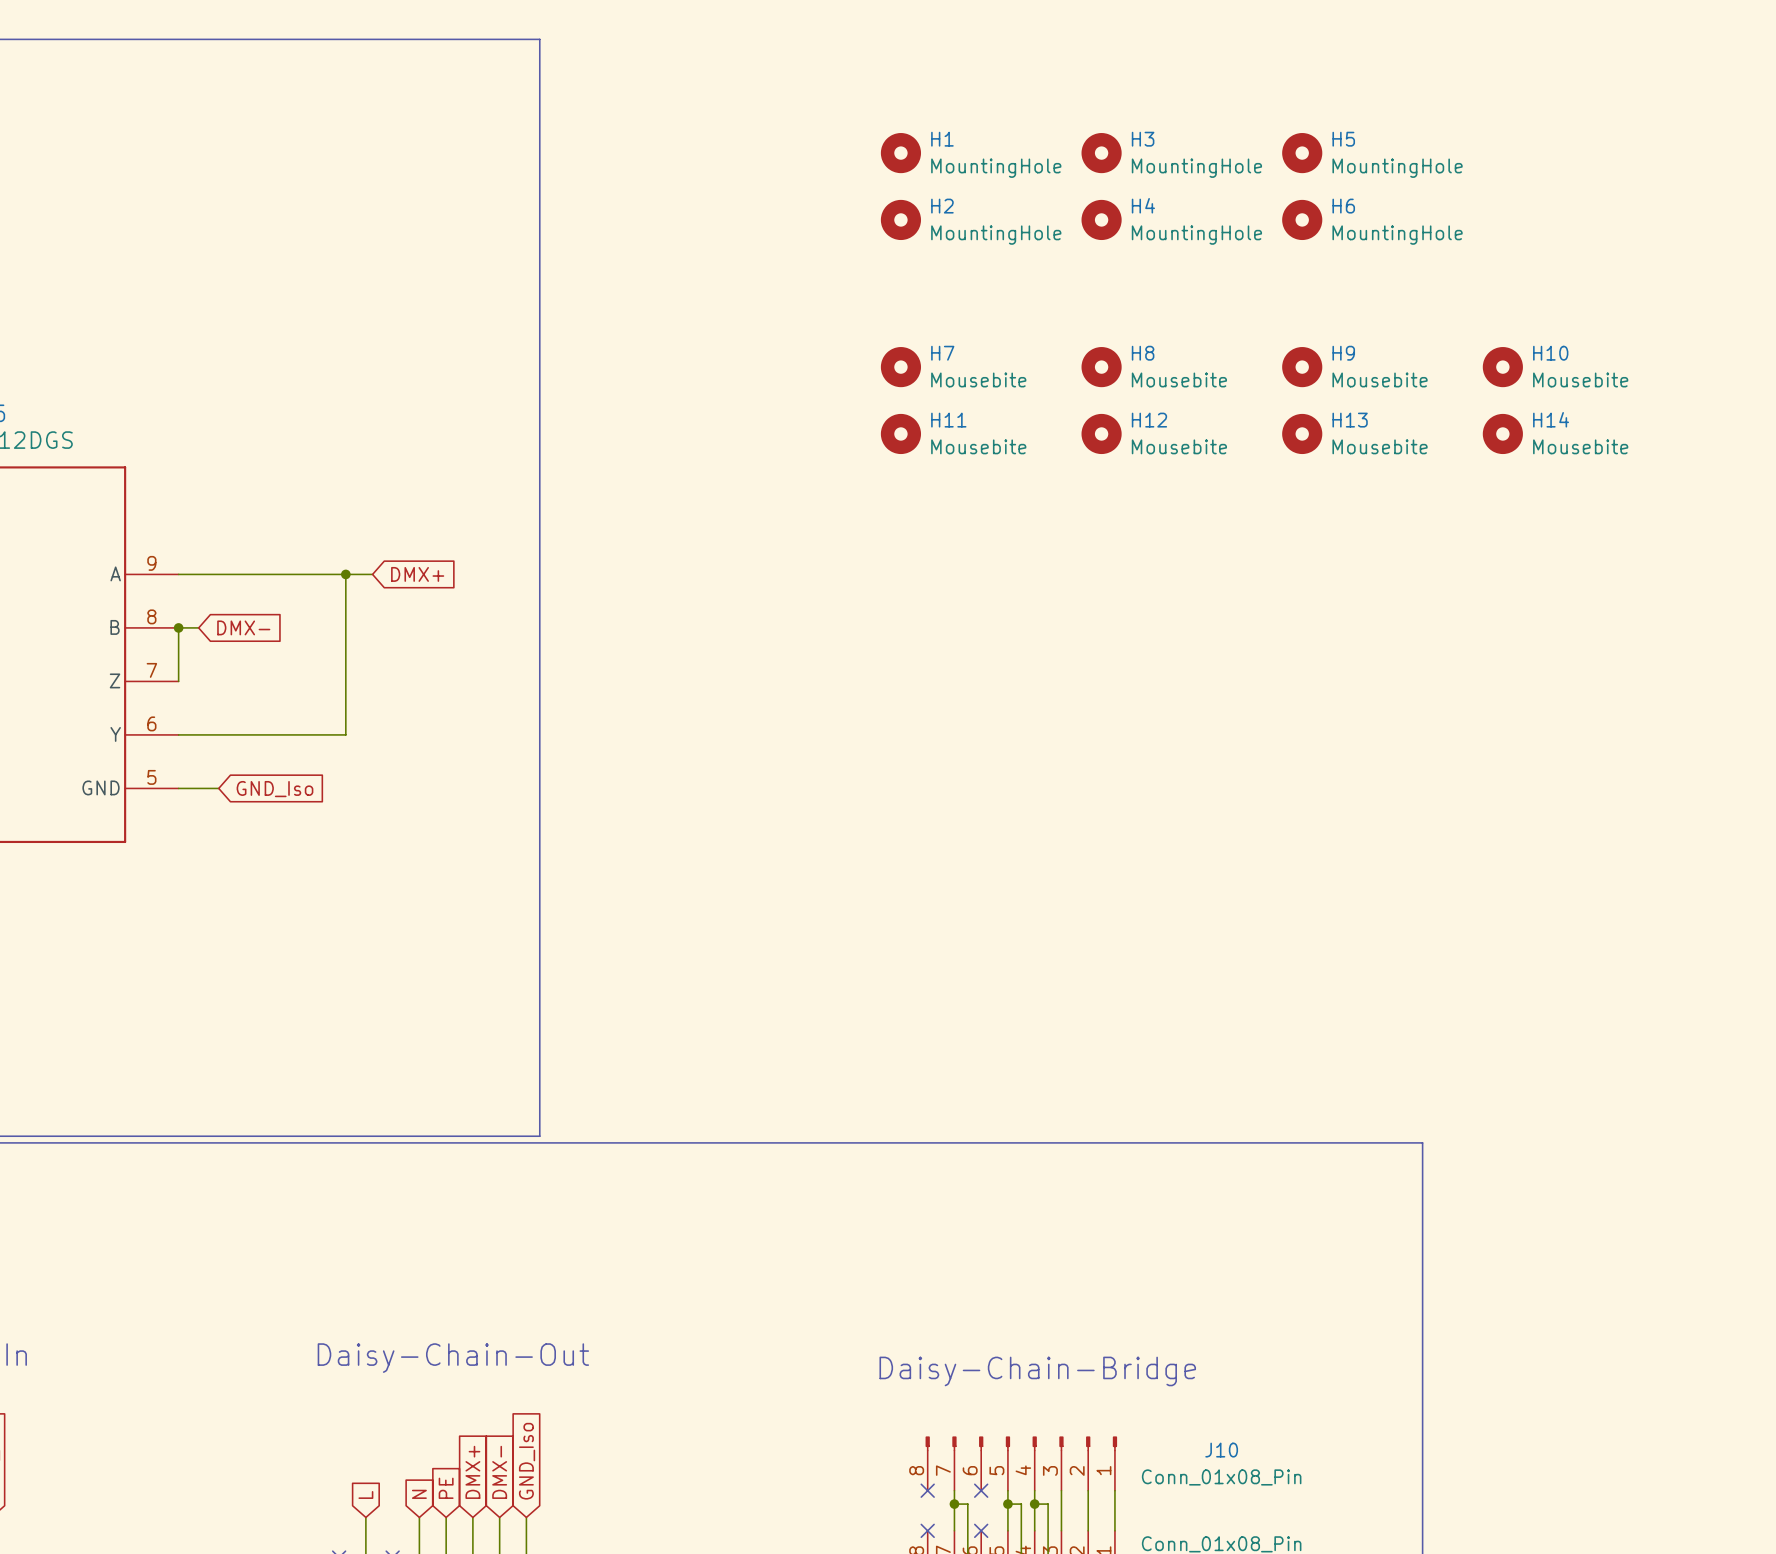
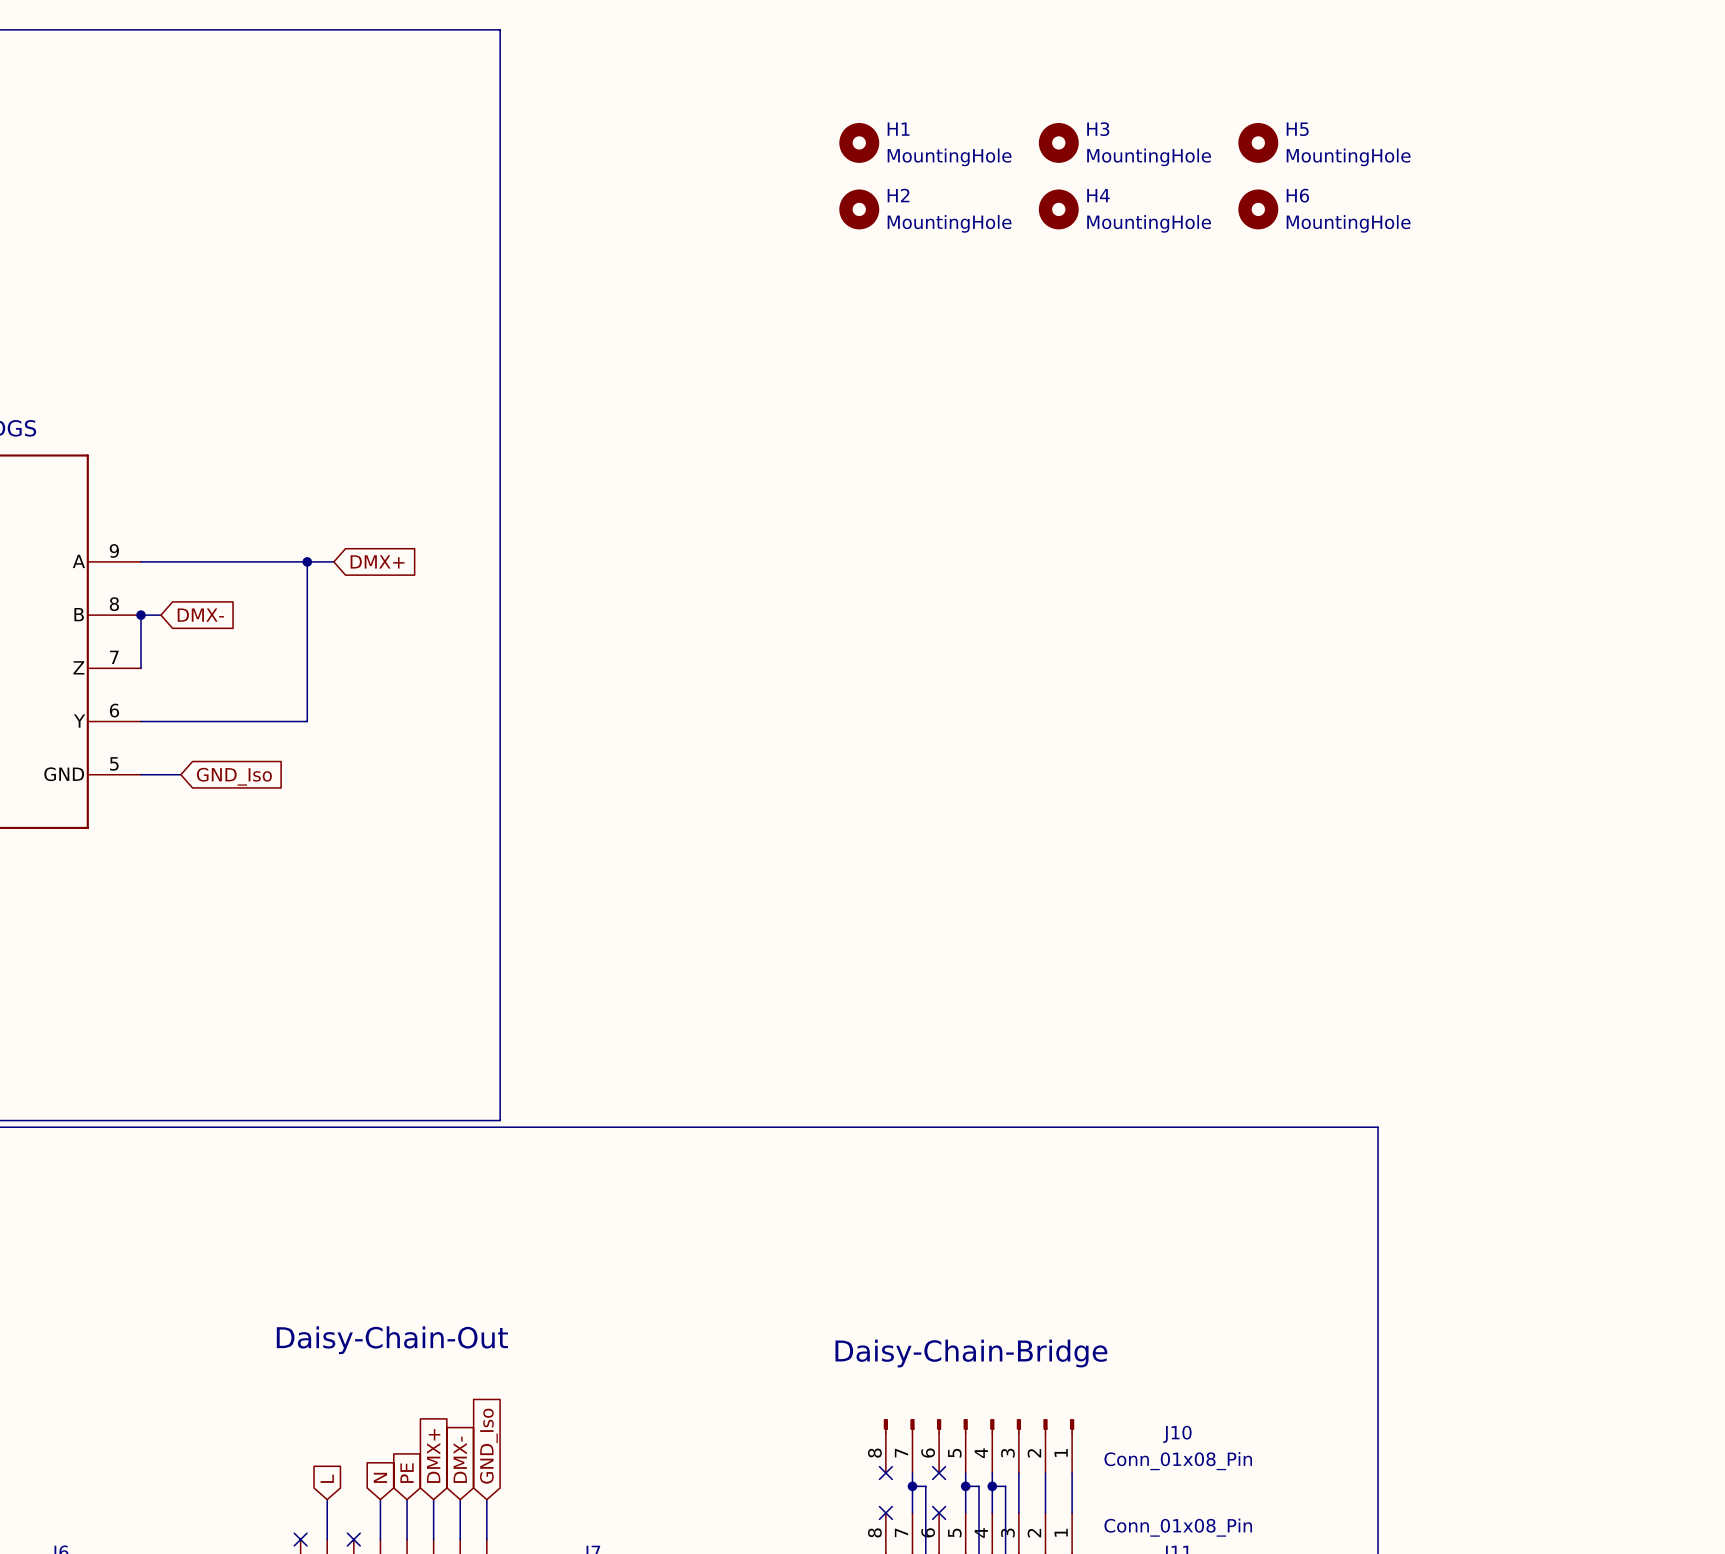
H7: Mousebite (900, 367) -> none
H8: Mousebite (1101, 367) -> none
H9: Mousebite (1302, 367) -> none
H10: Mousebite (1502, 367) -> none
H11: Mousebite (900, 433) -> none
H12: Mousebite (1101, 433) -> none
H13: Mousebite (1302, 433) -> none
H14: Mousebite (1502, 433) -> none

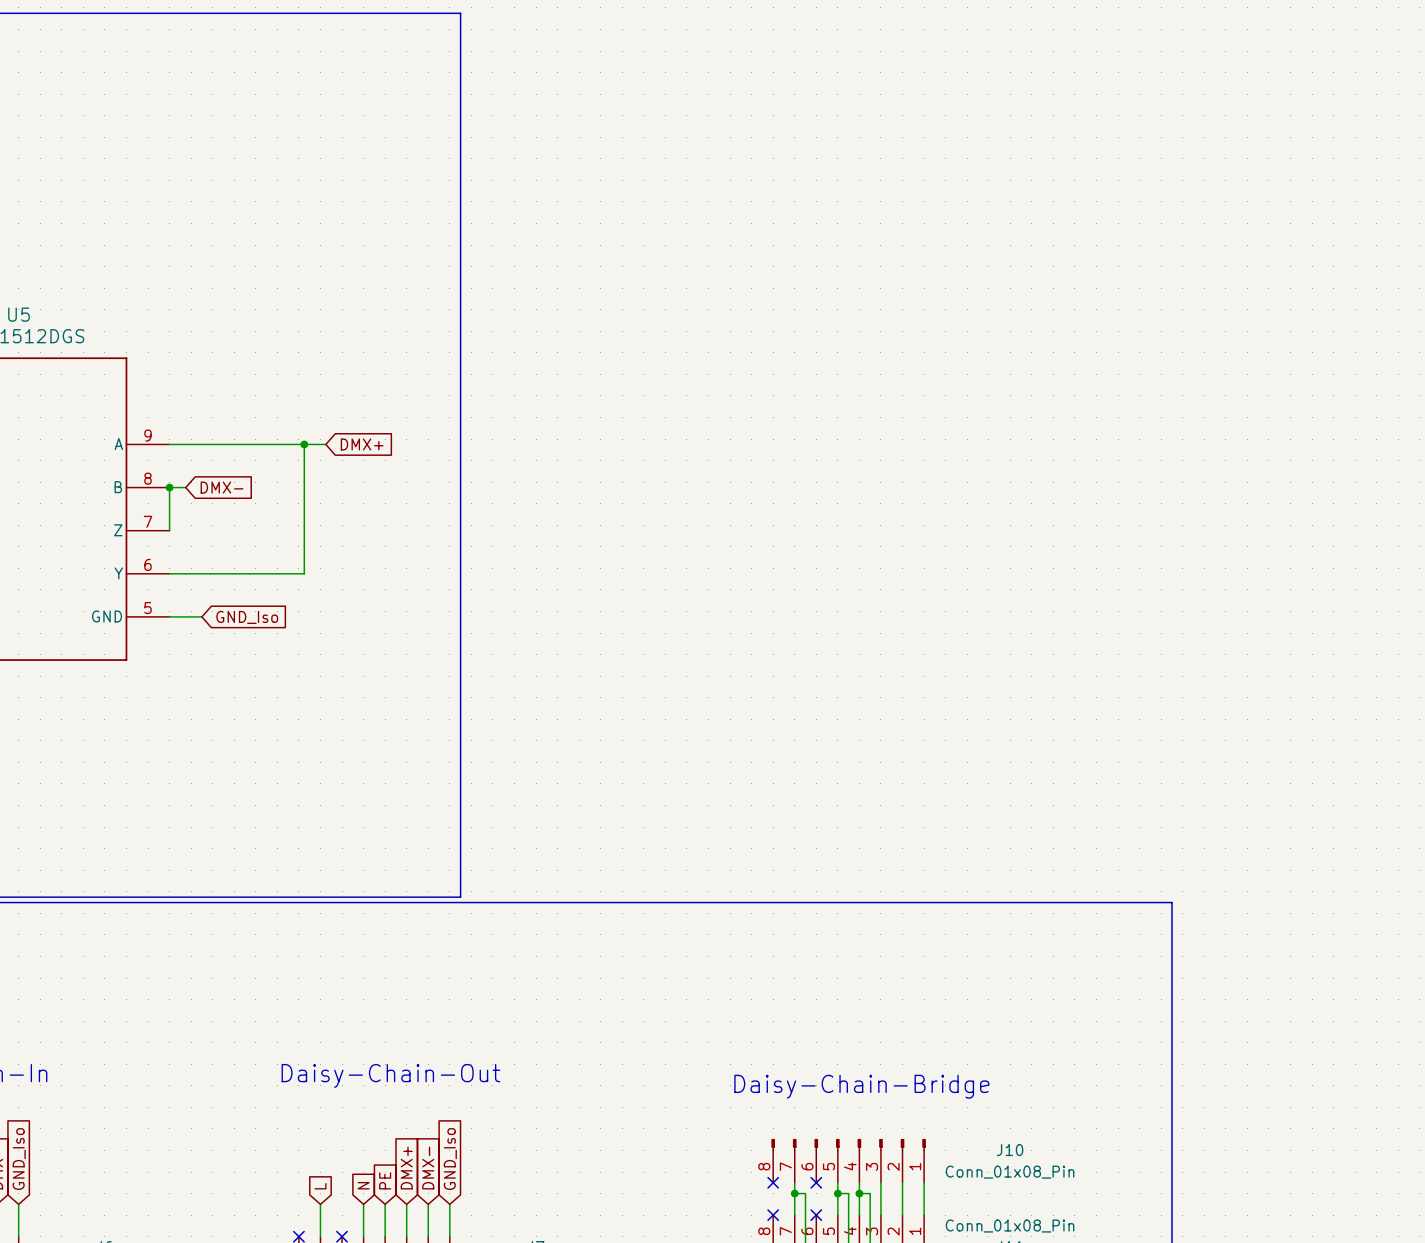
H1: MountingHole (859, 142) -> none
H3: MountingHole (1058, 142) -> none
H5: MountingHole (1258, 142) -> none
H2: MountingHole (859, 209) -> none
H4: MountingHole (1058, 209) -> none
H6: MountingHole (1258, 209) -> none

